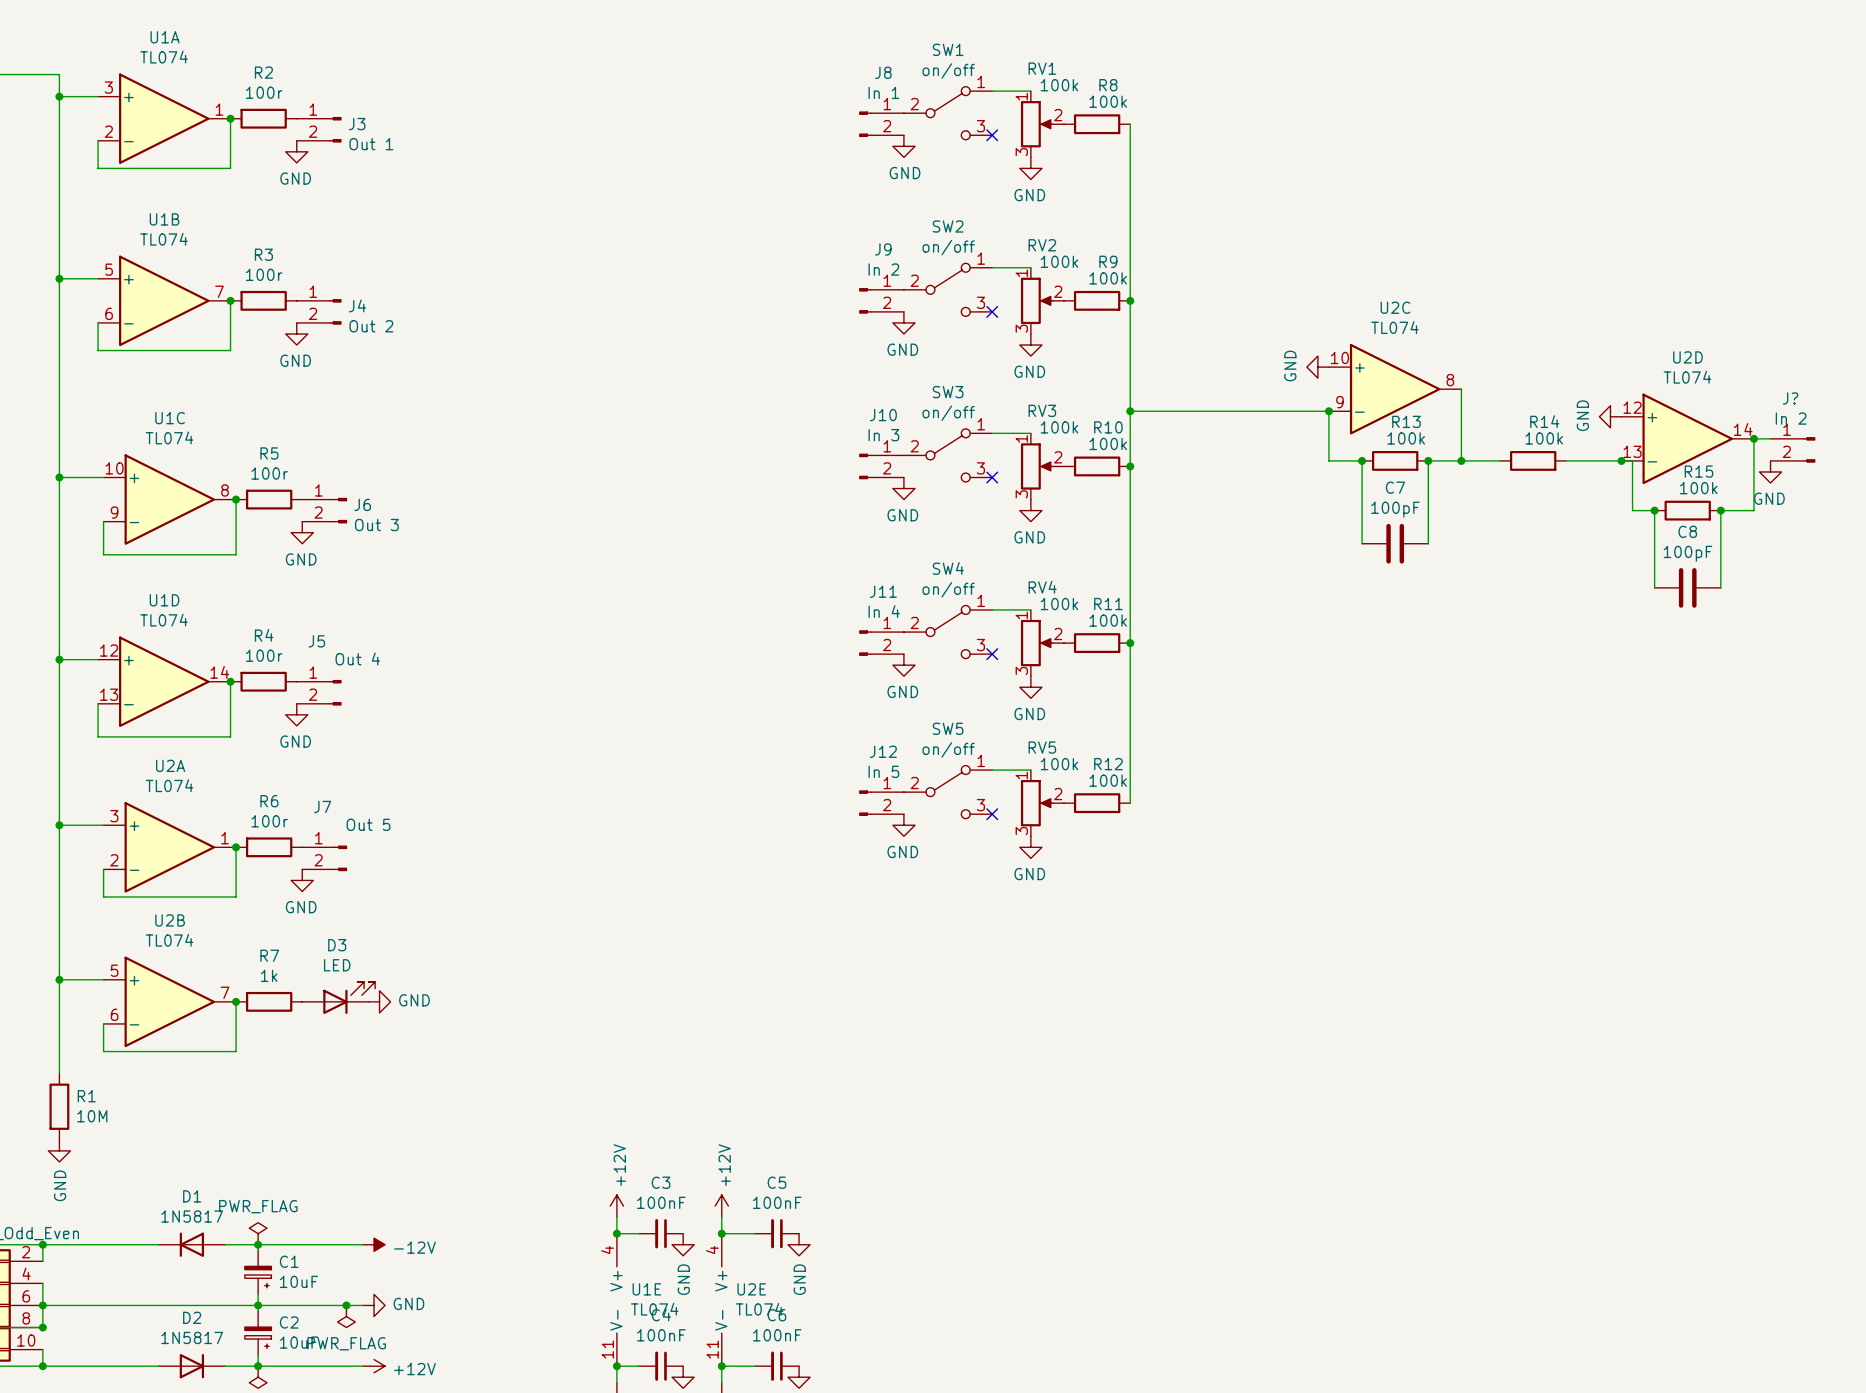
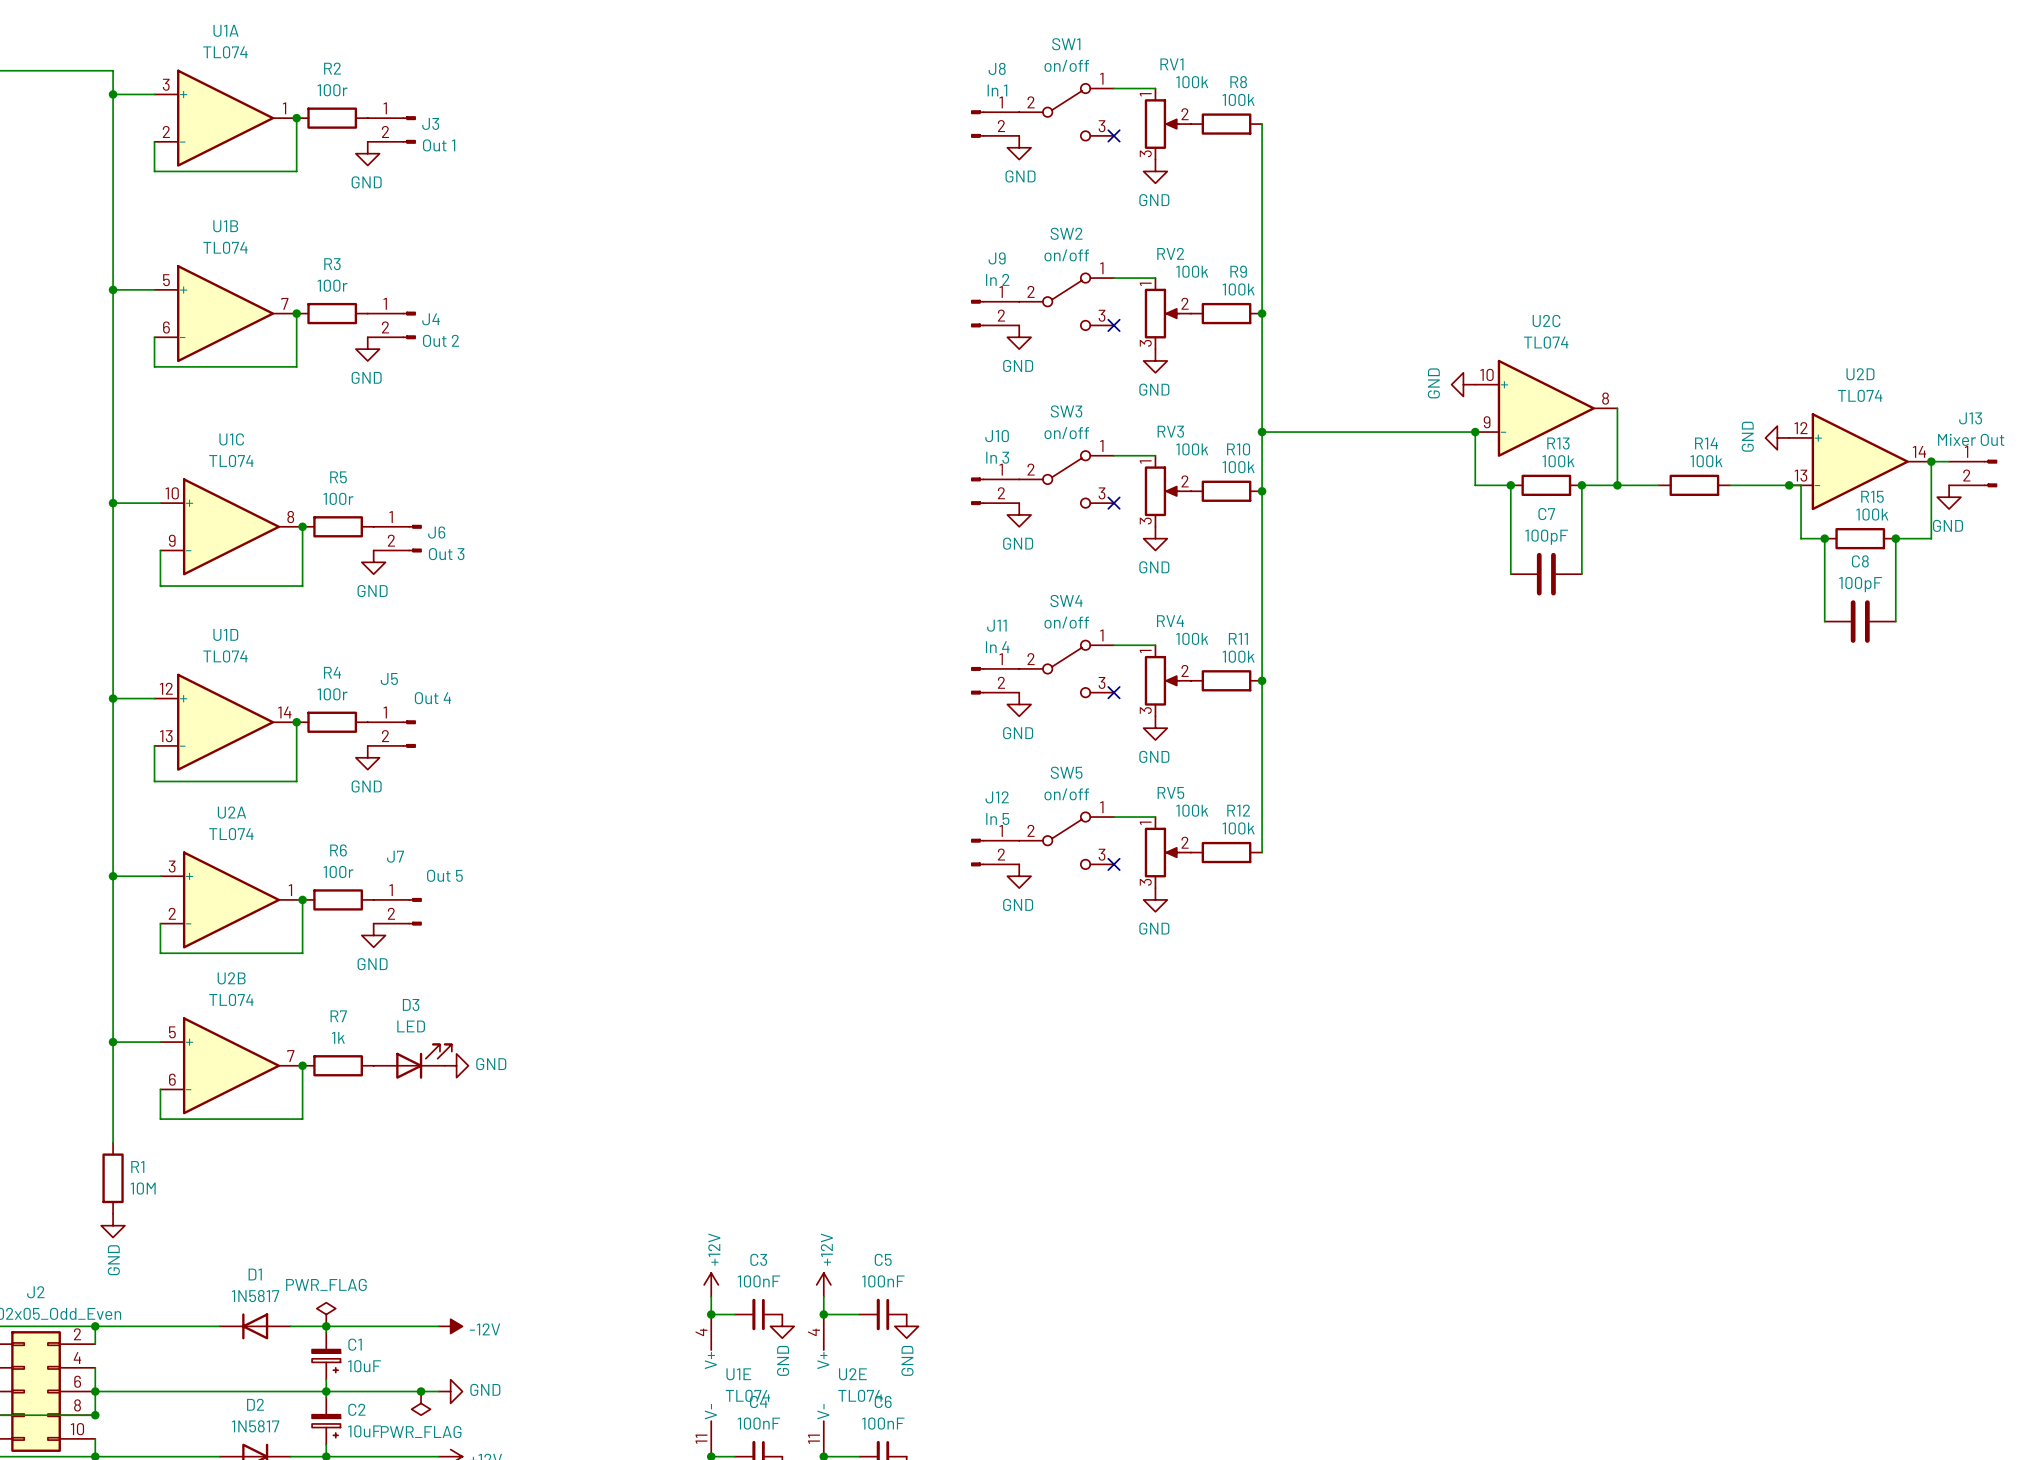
J? name: J? (1790, 398) -> J13 (1970, 418)
J? value: In 2 (1791, 418) -> Mixer Out (1971, 439)

